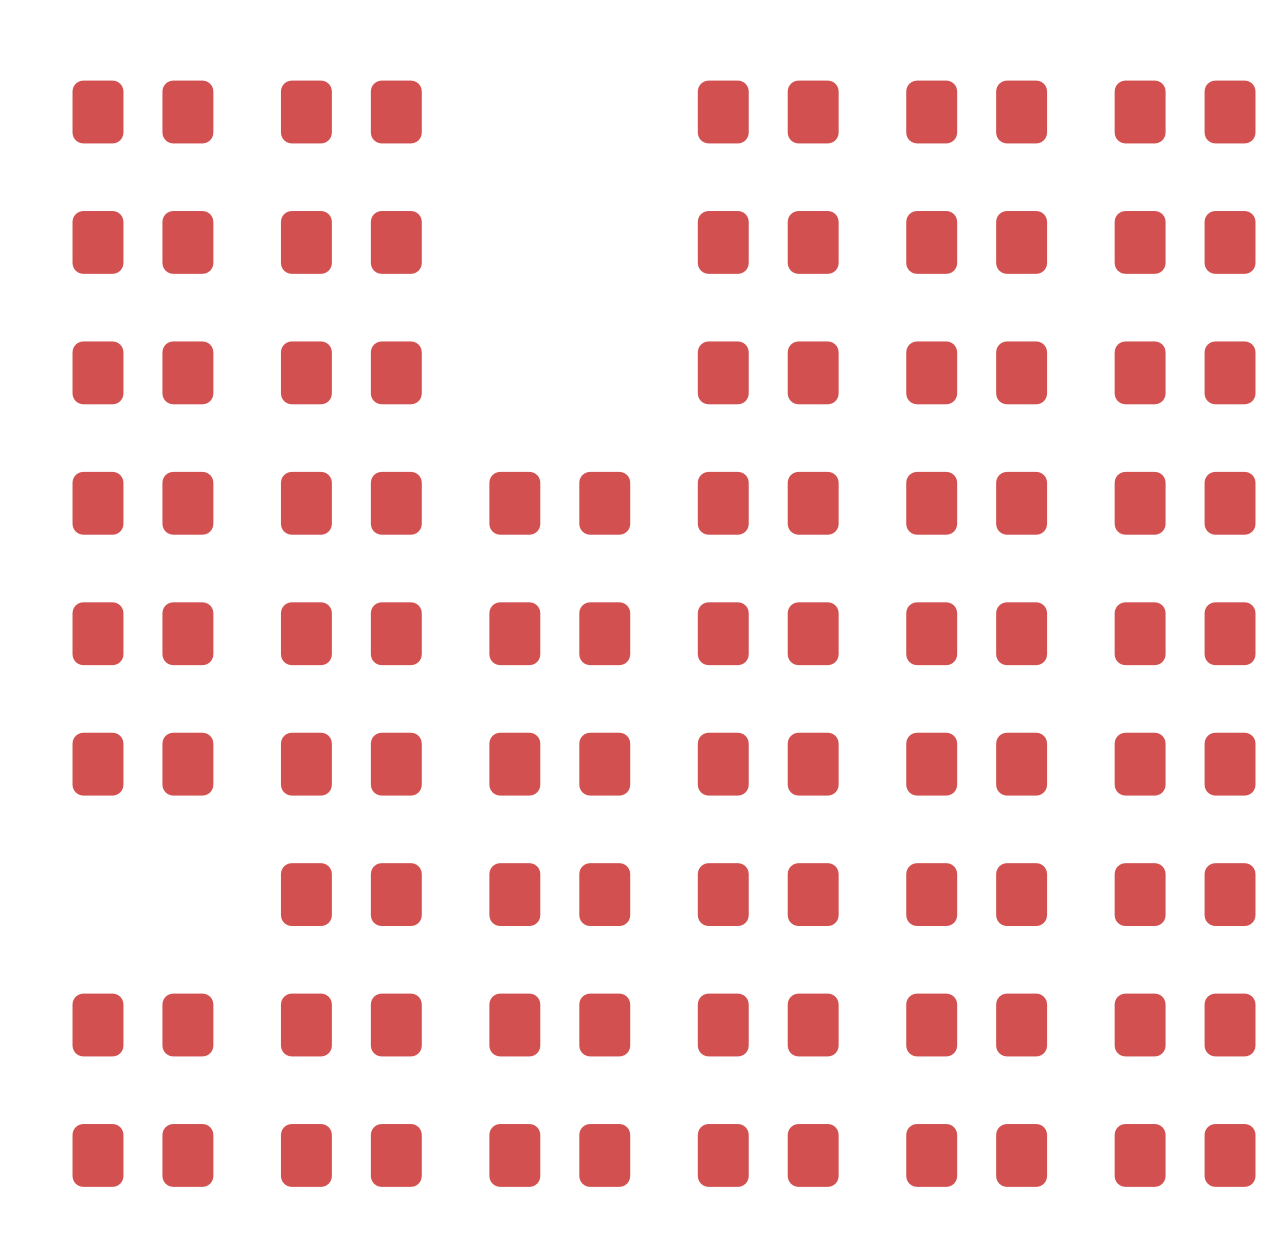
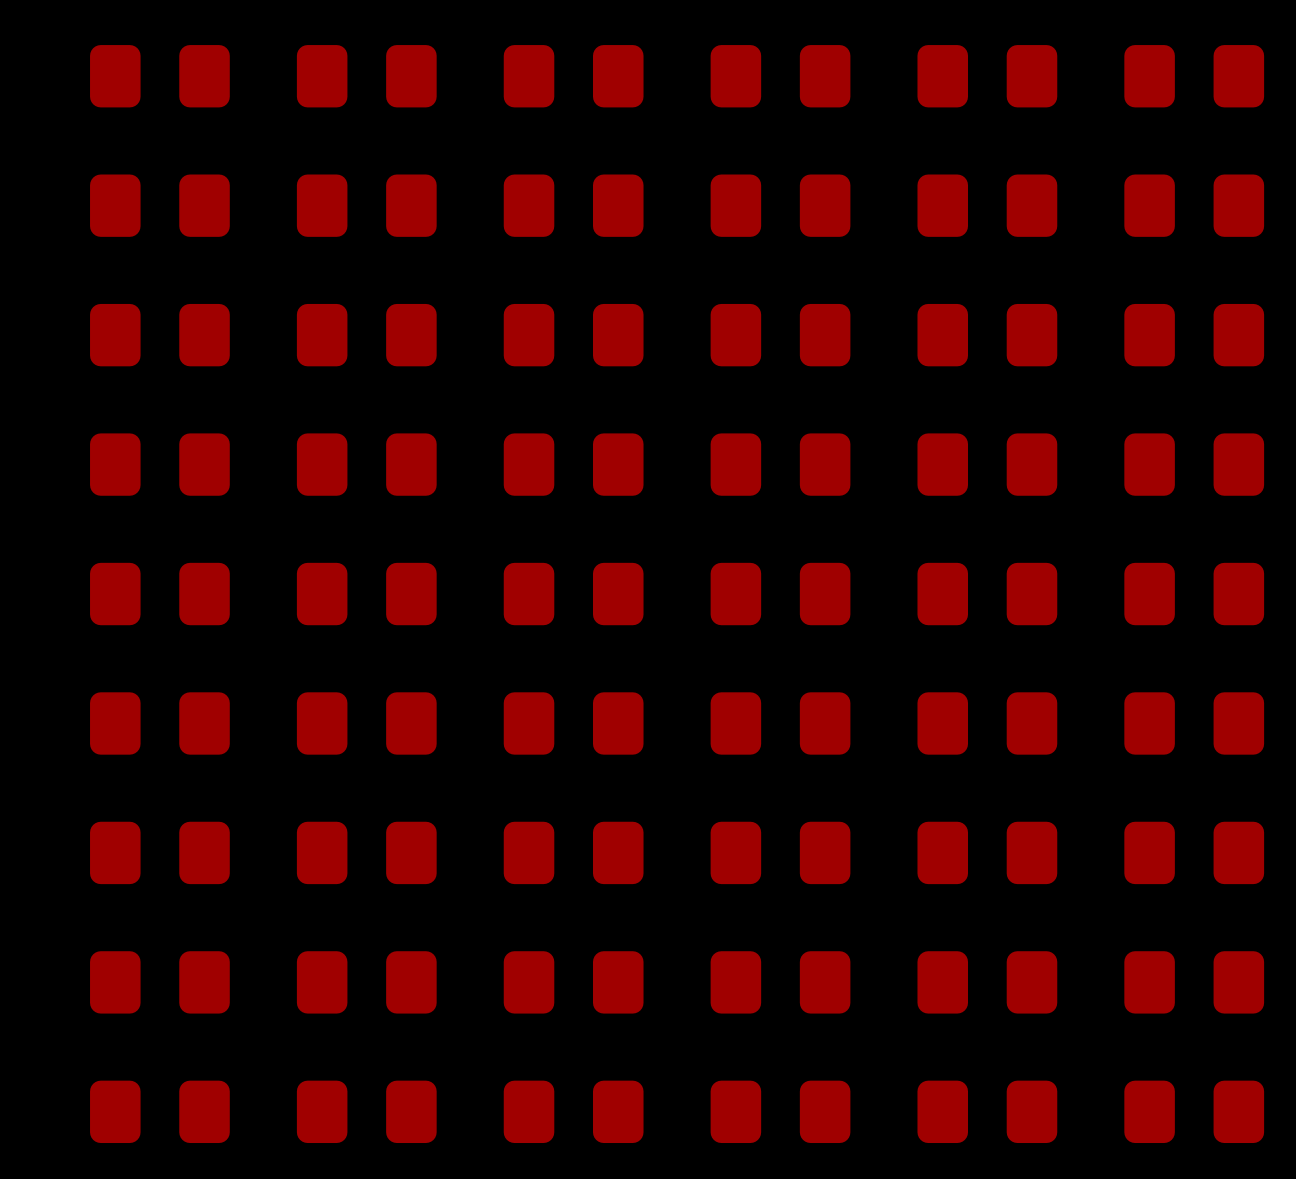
part: none -> (573, 76)
part: none -> (573, 205)
part: none -> (573, 335)
part: none -> (159, 852)

